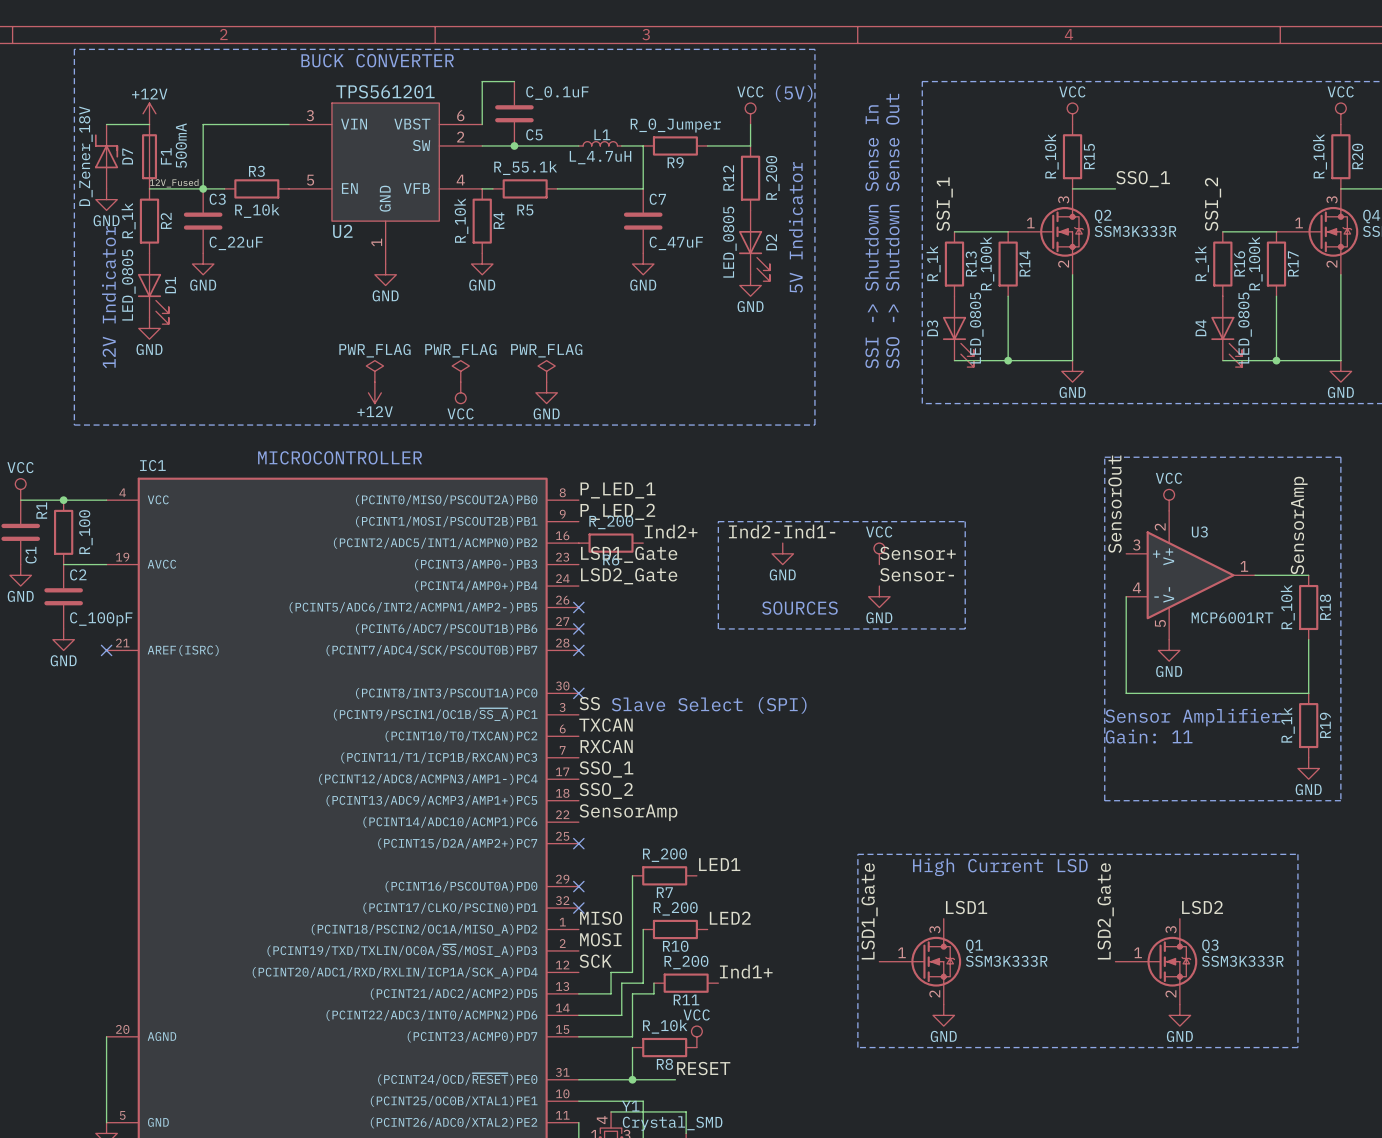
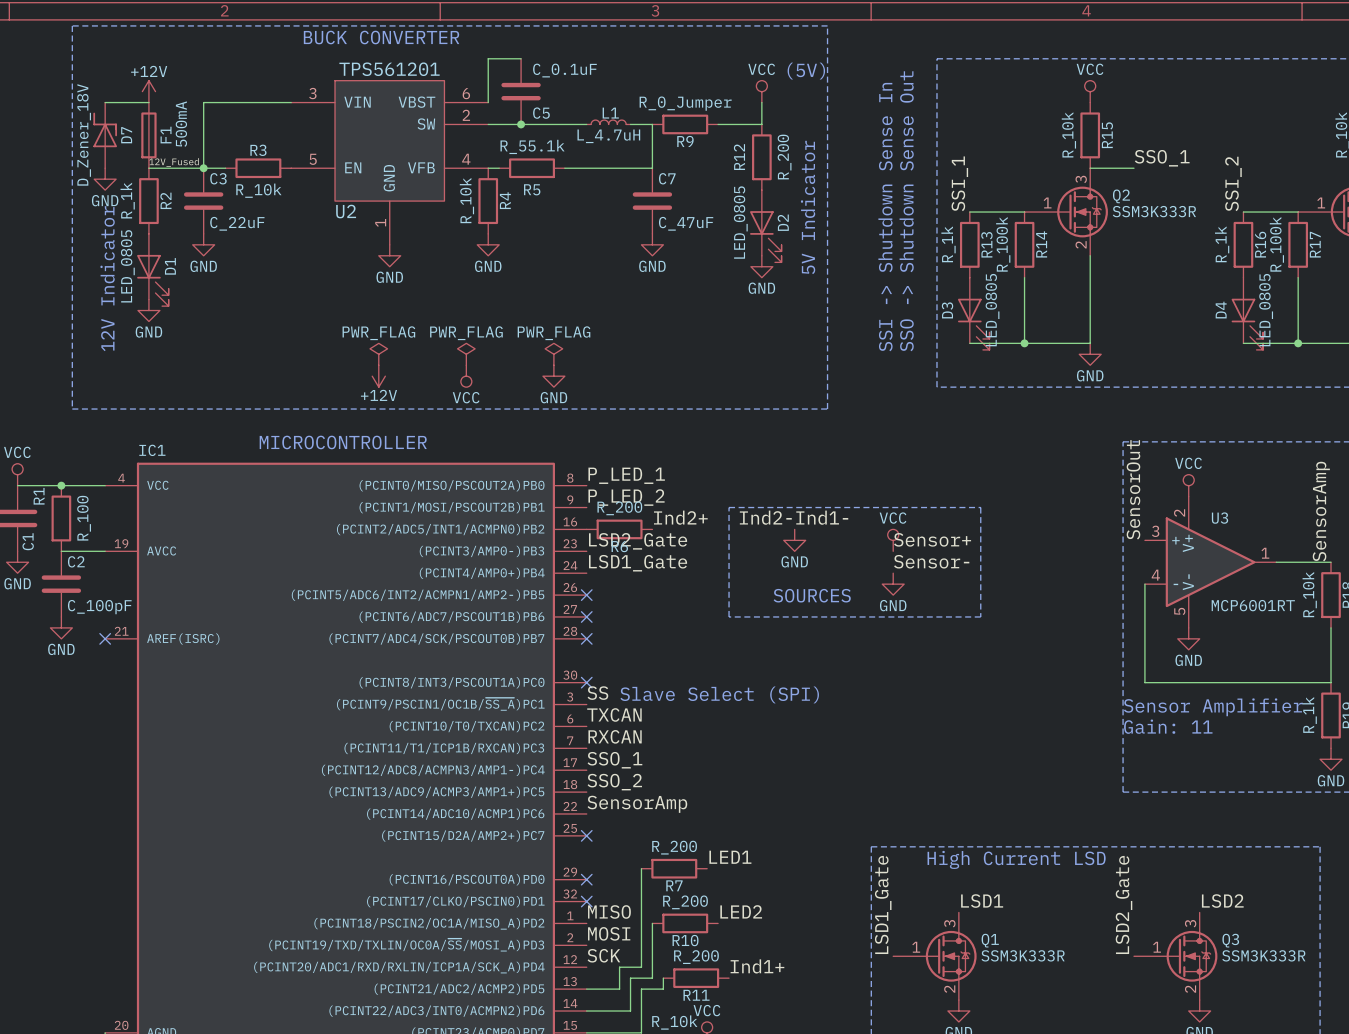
label: LSD1_Gate (629, 554) -> LSD2_Gate (638, 541)
label: LSD2_Gate (629, 576) -> LSD1_Gate (638, 563)

